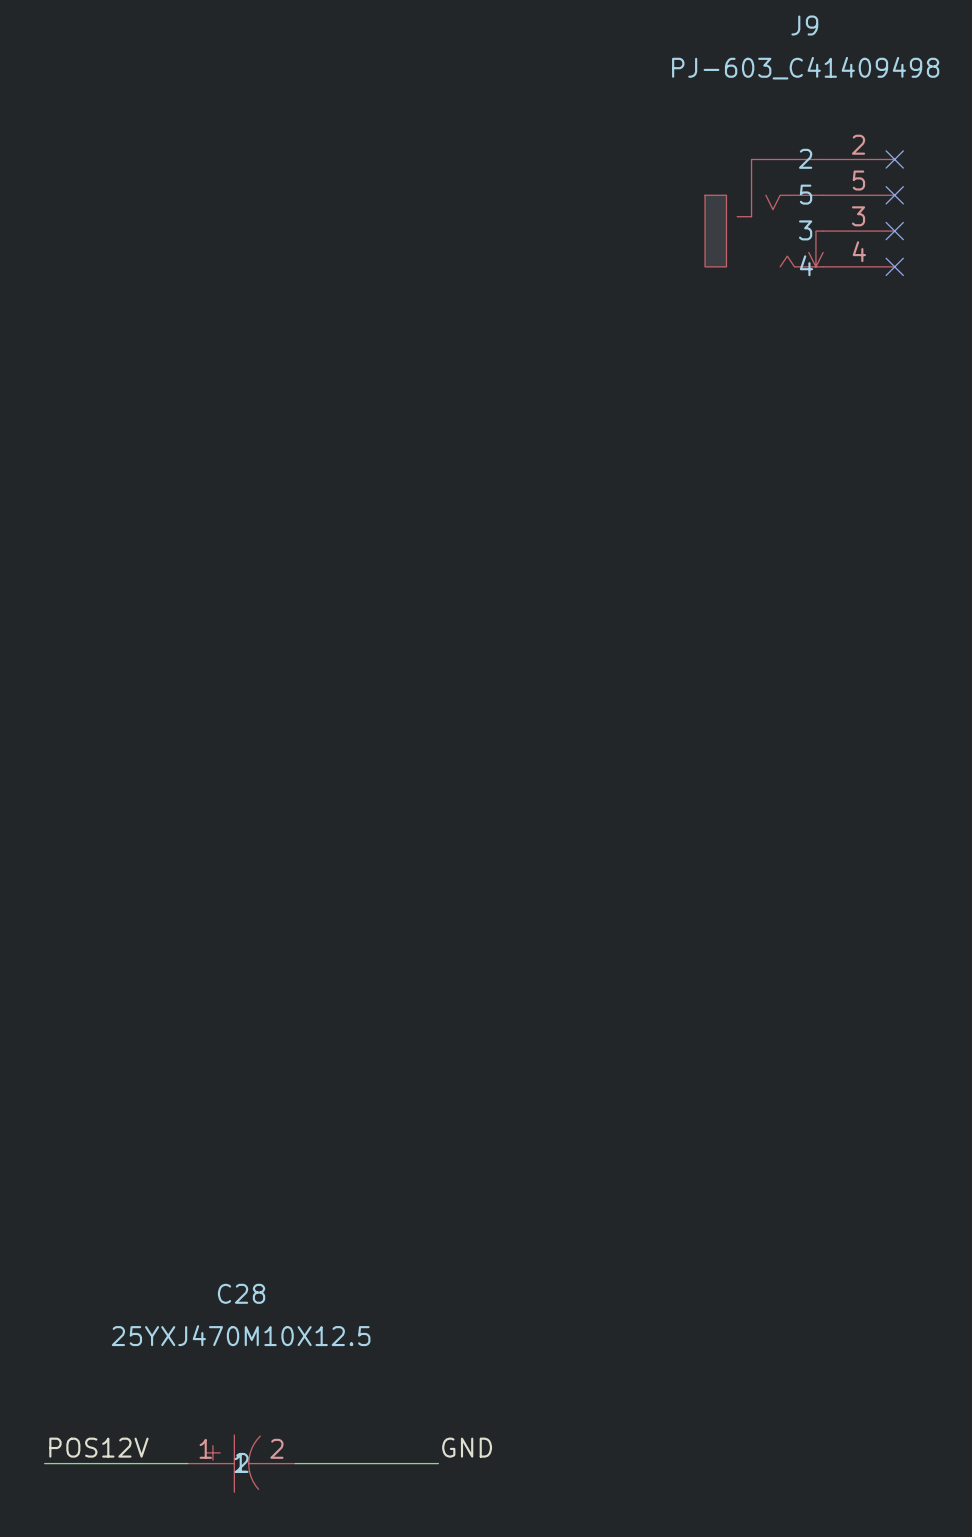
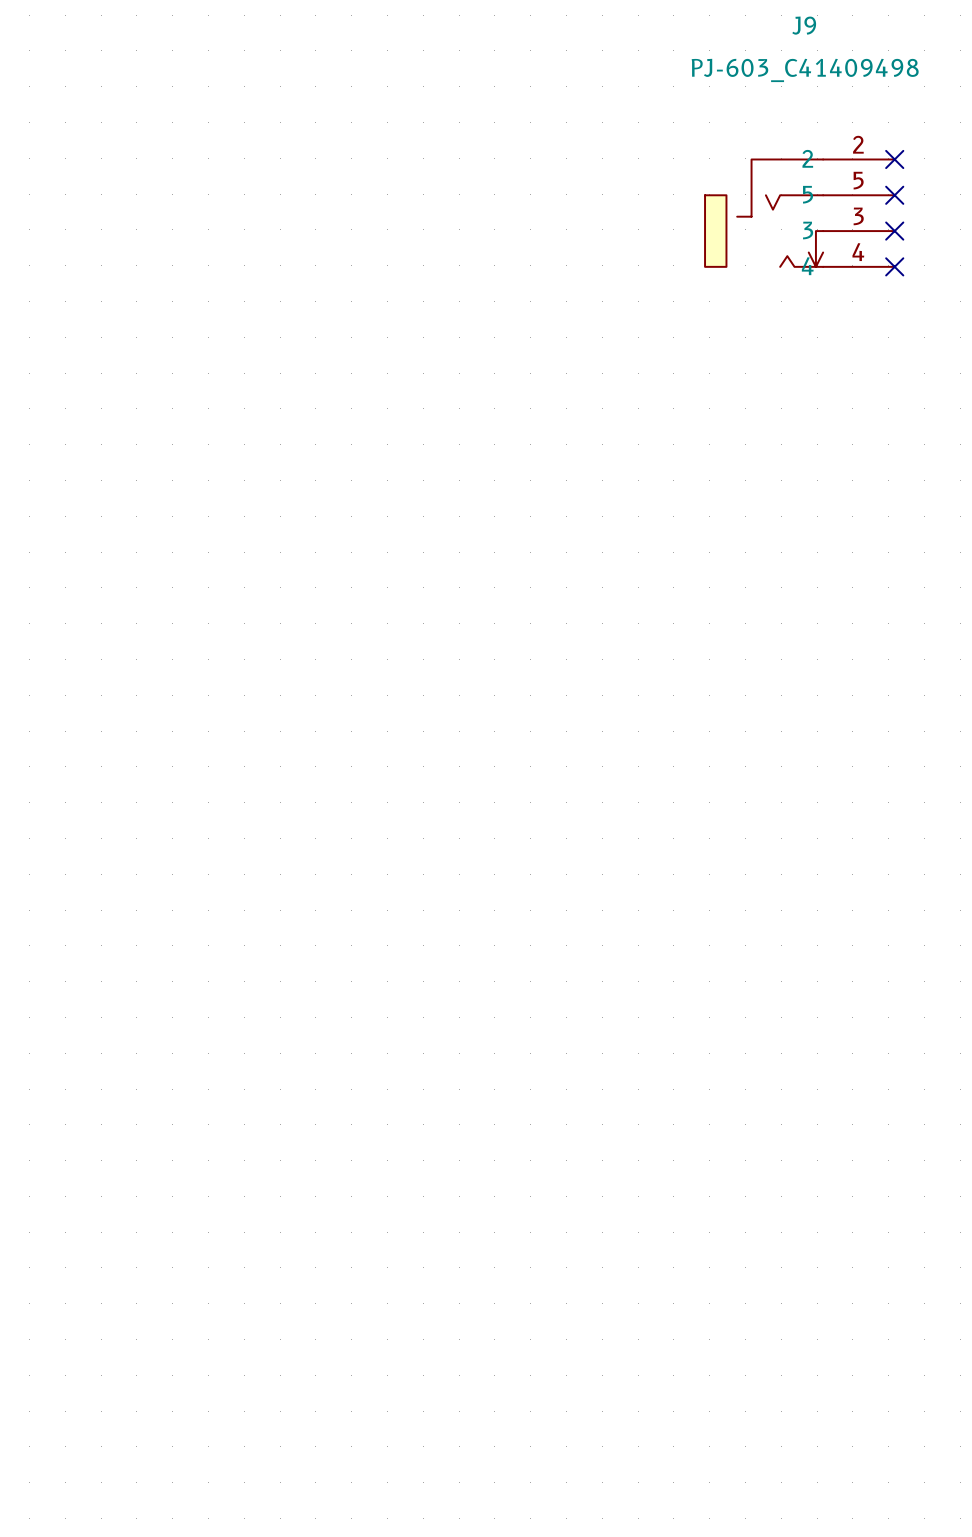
label: POS12V (98, 1447) -> none
label: GND (467, 1447) -> none
wire: (44, 1463) (187, 1463) -> none
C28: 25YXJ470M10X12.5 (241, 1463) -> none
wire: (295, 1463) (438, 1463) -> none

